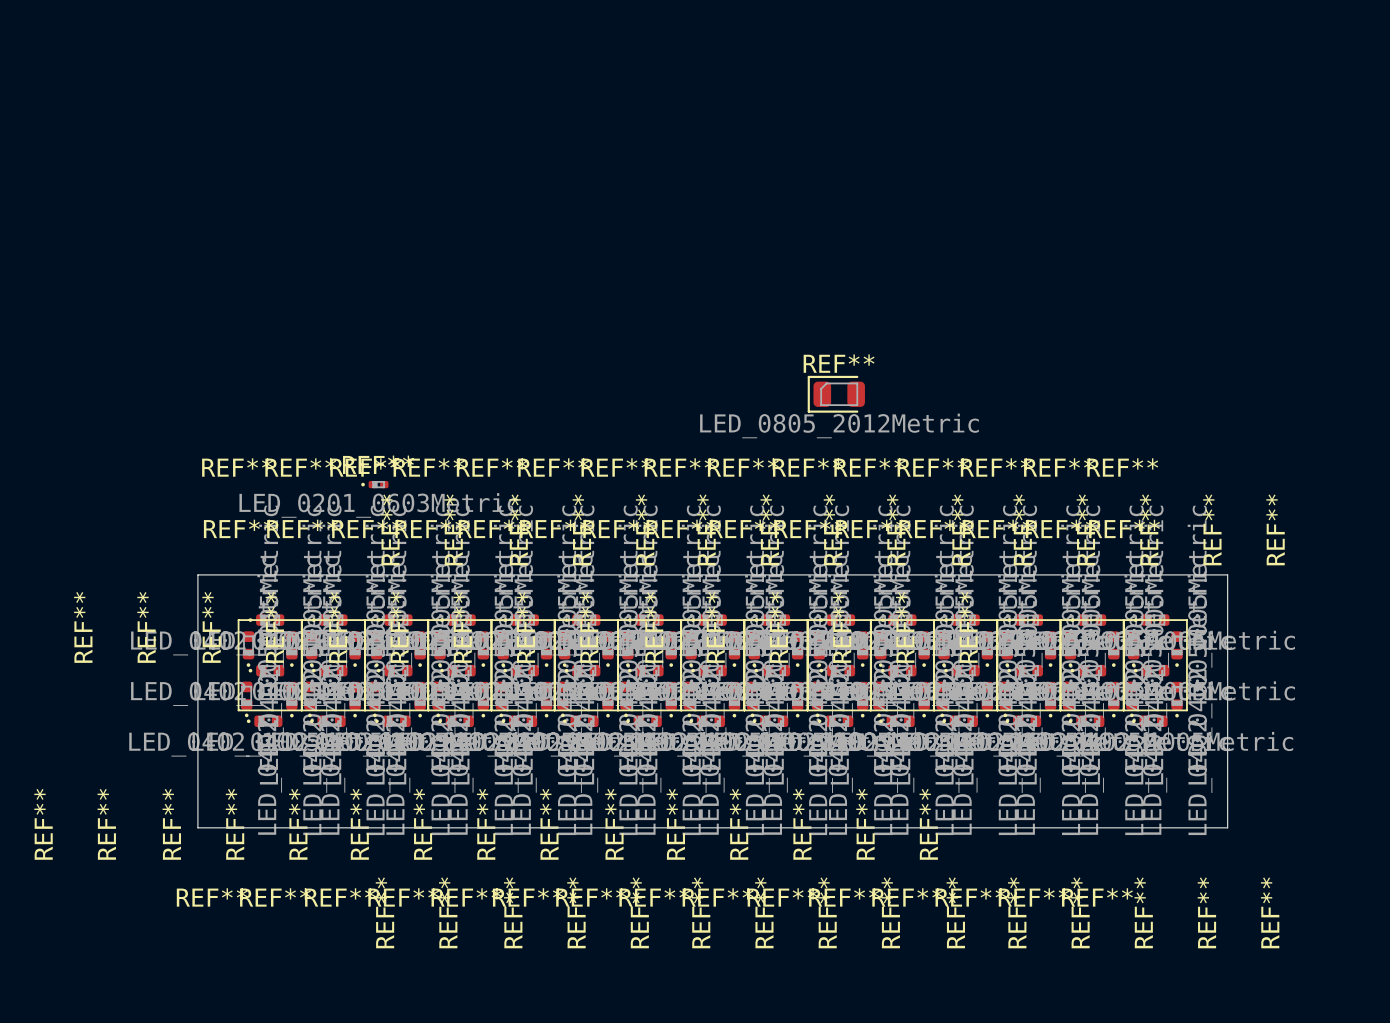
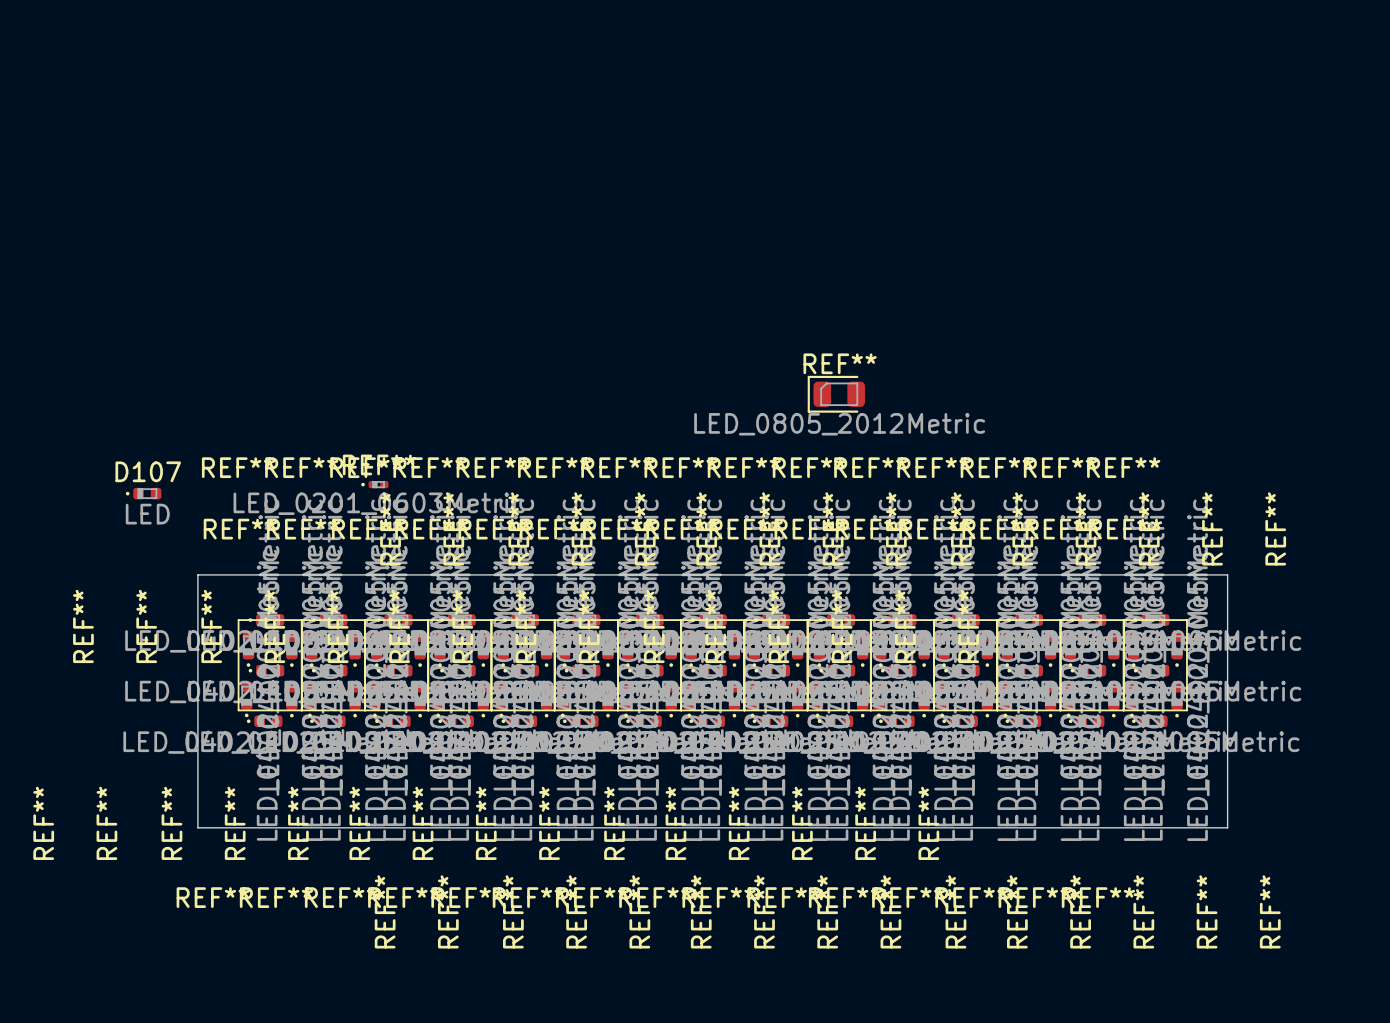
D107: none -> LED (143, 493)

